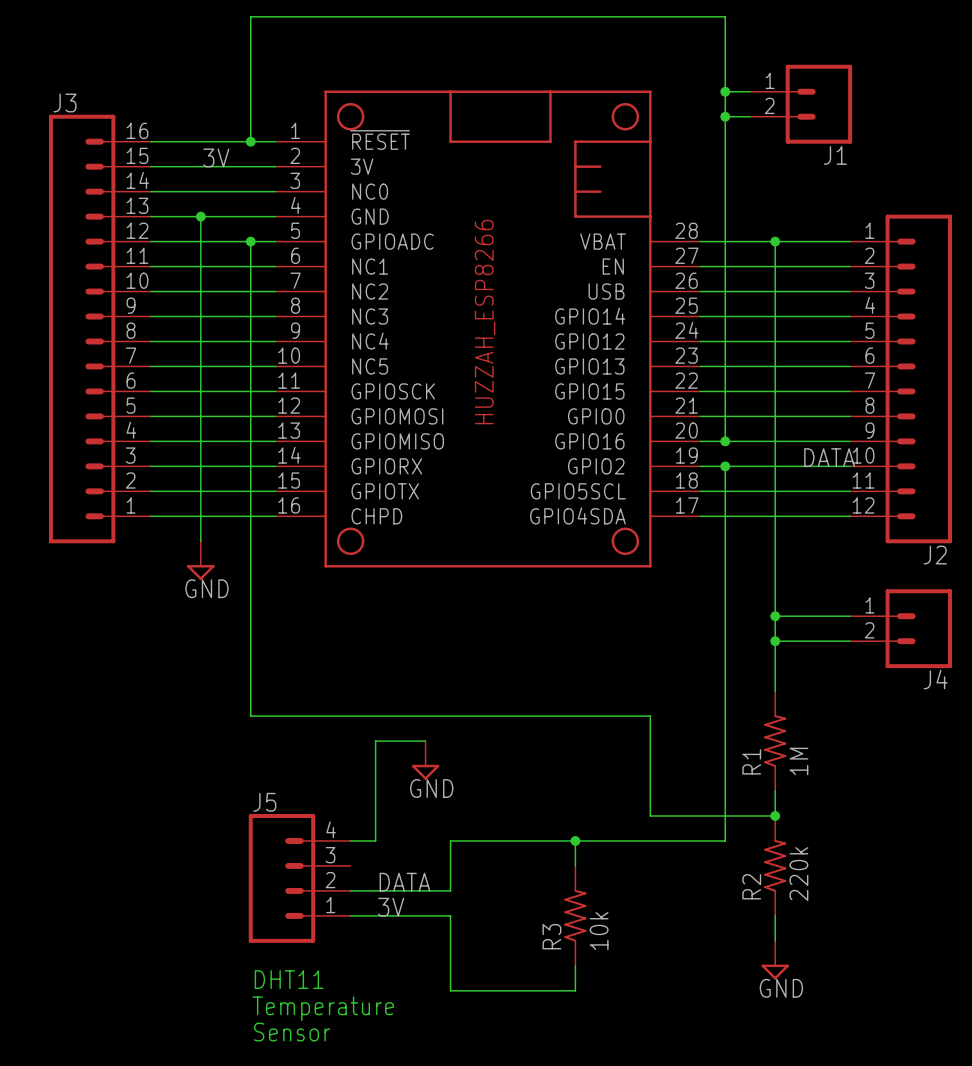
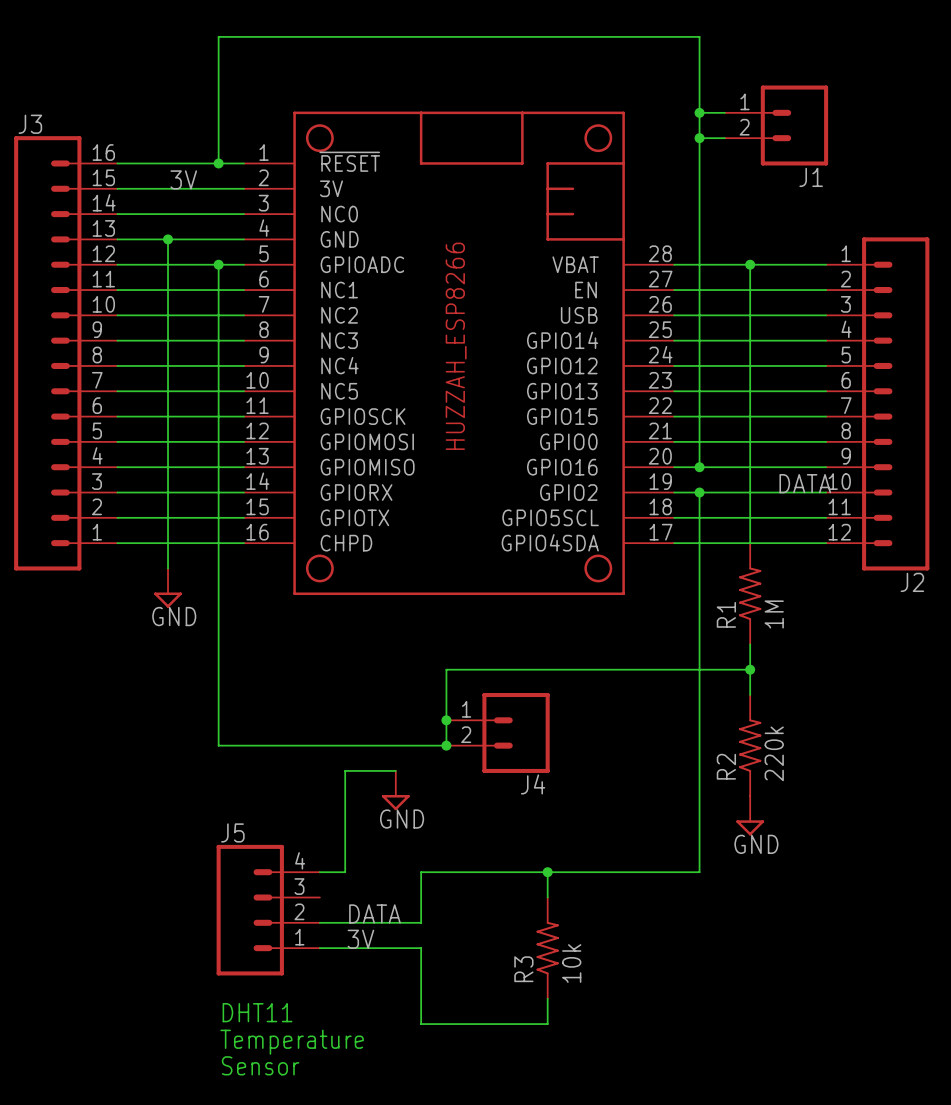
wire: (775, 516) (775, 616) (850, 616) -> none
junction: (775, 616) -> none
J4 position: (901, 628) -> (498, 732)
wire: (775, 641) (850, 641) -> none
junction: none -> (446, 720)
wire: (475, 716) (650, 716) (650, 816) (775, 816) (775, 791) -> (446, 745) (446, 669) (750, 669)
junction: none -> (446, 745)
R1 position: (775, 741) -> (750, 593)
junction: (775, 816) -> none
R2 position: (775, 865) -> (750, 745)
wire: (775, 915) (775, 940) -> none
power symbol position: GND (775, 960) -> GND (750, 815)

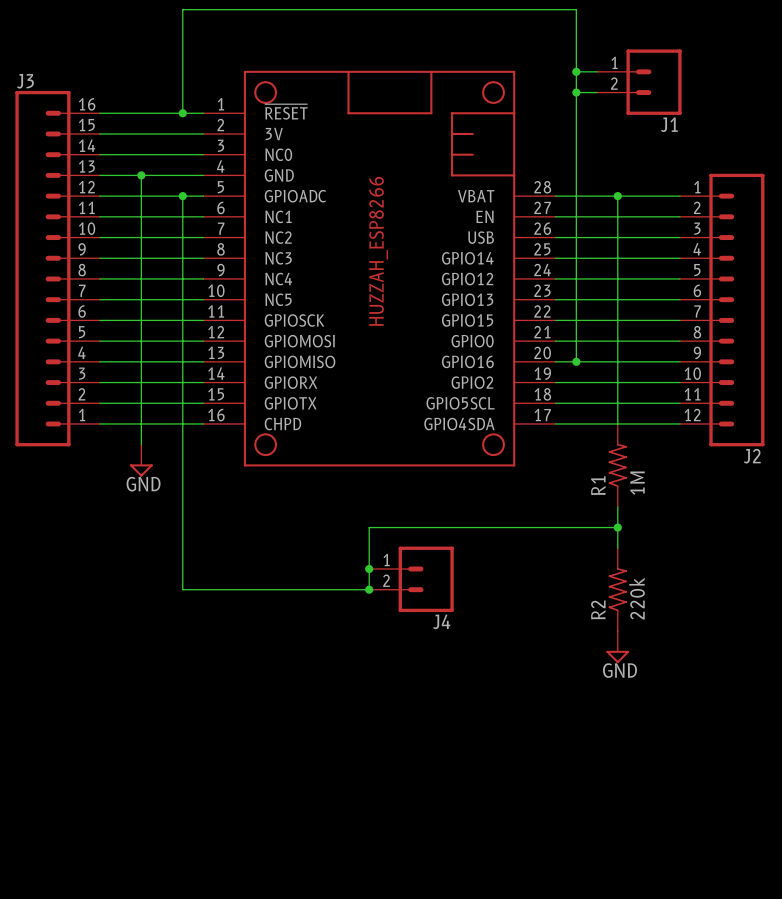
label: 3V (183, 179) -> none
label: DATA (805, 483) -> none
wire: (699, 492) (699, 872) (421, 872) (421, 922) (319, 922) -> none
junction: (699, 492) -> none
wire: (395, 770) (345, 770) (345, 872) (319, 872) -> none
power symbol: GND (395, 790) -> none
wire: (547, 872) (547, 897) -> none
junction: (547, 872) -> none
J5: (268, 910) -> none
label: DATA (374, 913) -> none
label: 3V (360, 939) -> none
wire: (319, 948) (421, 948) (421, 1024) (547, 1024) (547, 998) -> none
R3: 10k (547, 948) -> none
text: DHT11 (257, 1012) -> none
text: Temperature (292, 1042) -> none
text: Sensor (260, 1065) -> none

